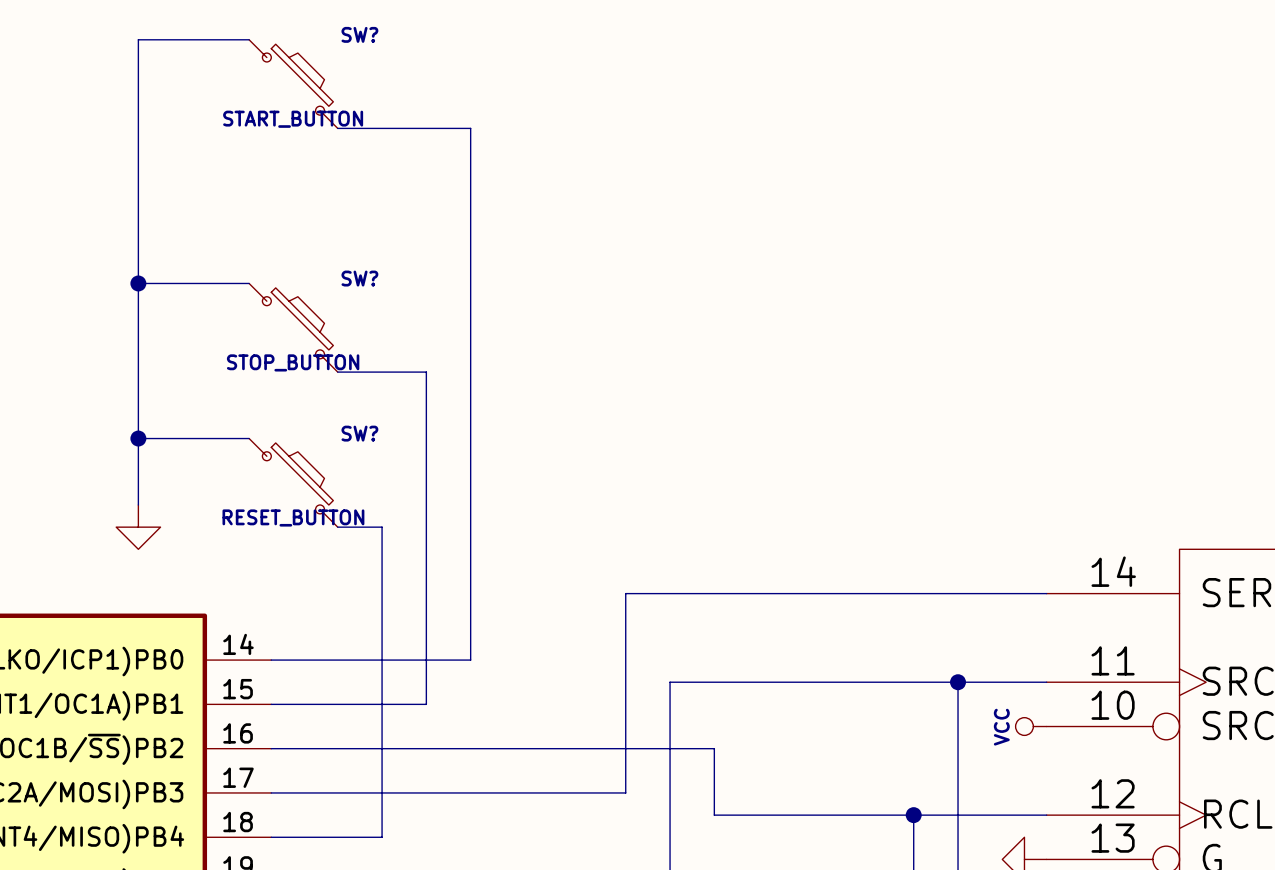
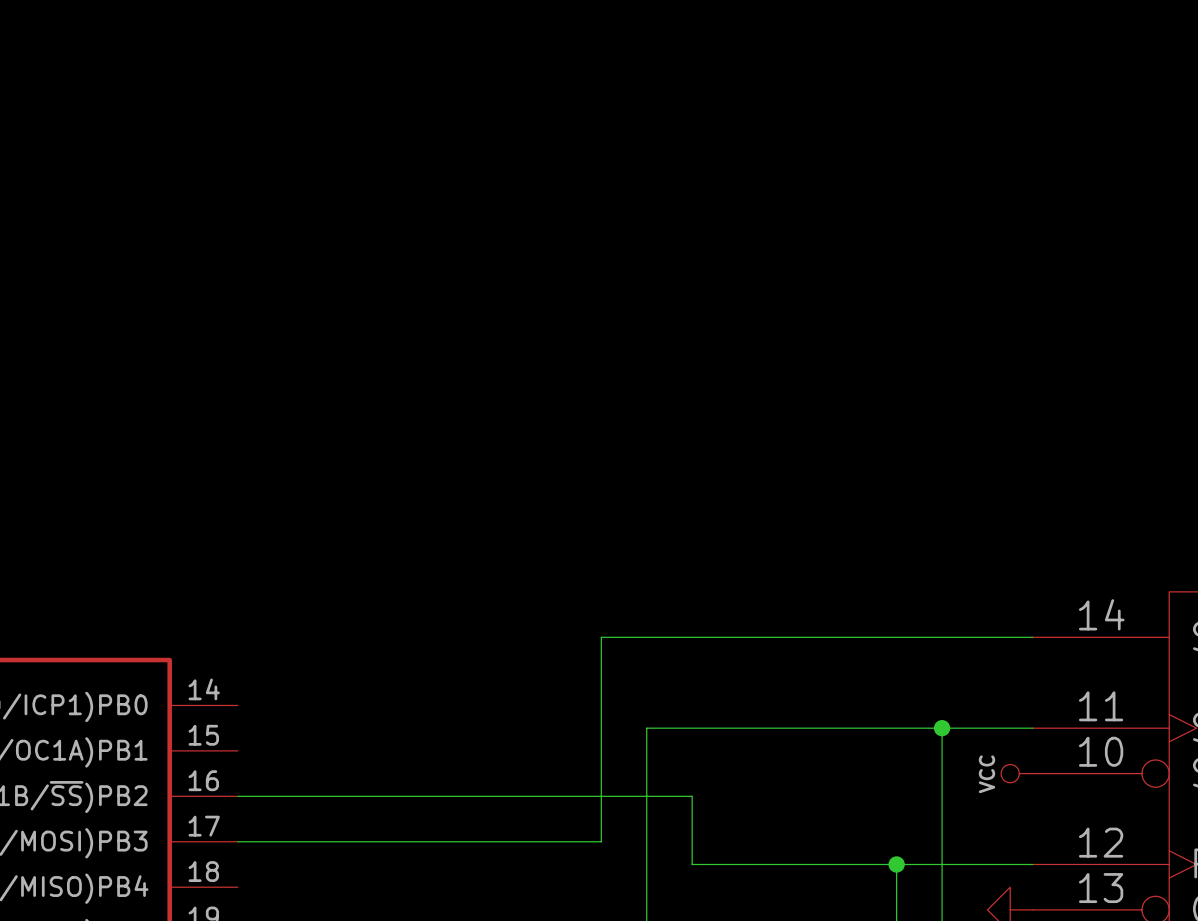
wire: (249, 39) (138, 39) (138, 505) -> none
SW?: START_BUTTON (293, 84) -> none
wire: (337, 128) (470, 128) (470, 660) (271, 660) -> none
wire: (138, 283) (249, 283) -> none
junction: (138, 283) -> none
SW?: STOP_BUTTON (293, 327) -> none
wire: (337, 372) (426, 372) (426, 704) (271, 704) -> none
wire: (138, 438) (249, 438) -> none
junction: (138, 438) -> none
SW?: RESET_BUTTON (293, 482) -> none
power symbol: (138, 527) -> none
wire: (337, 527) (382, 527) (382, 837) (271, 837) -> none

